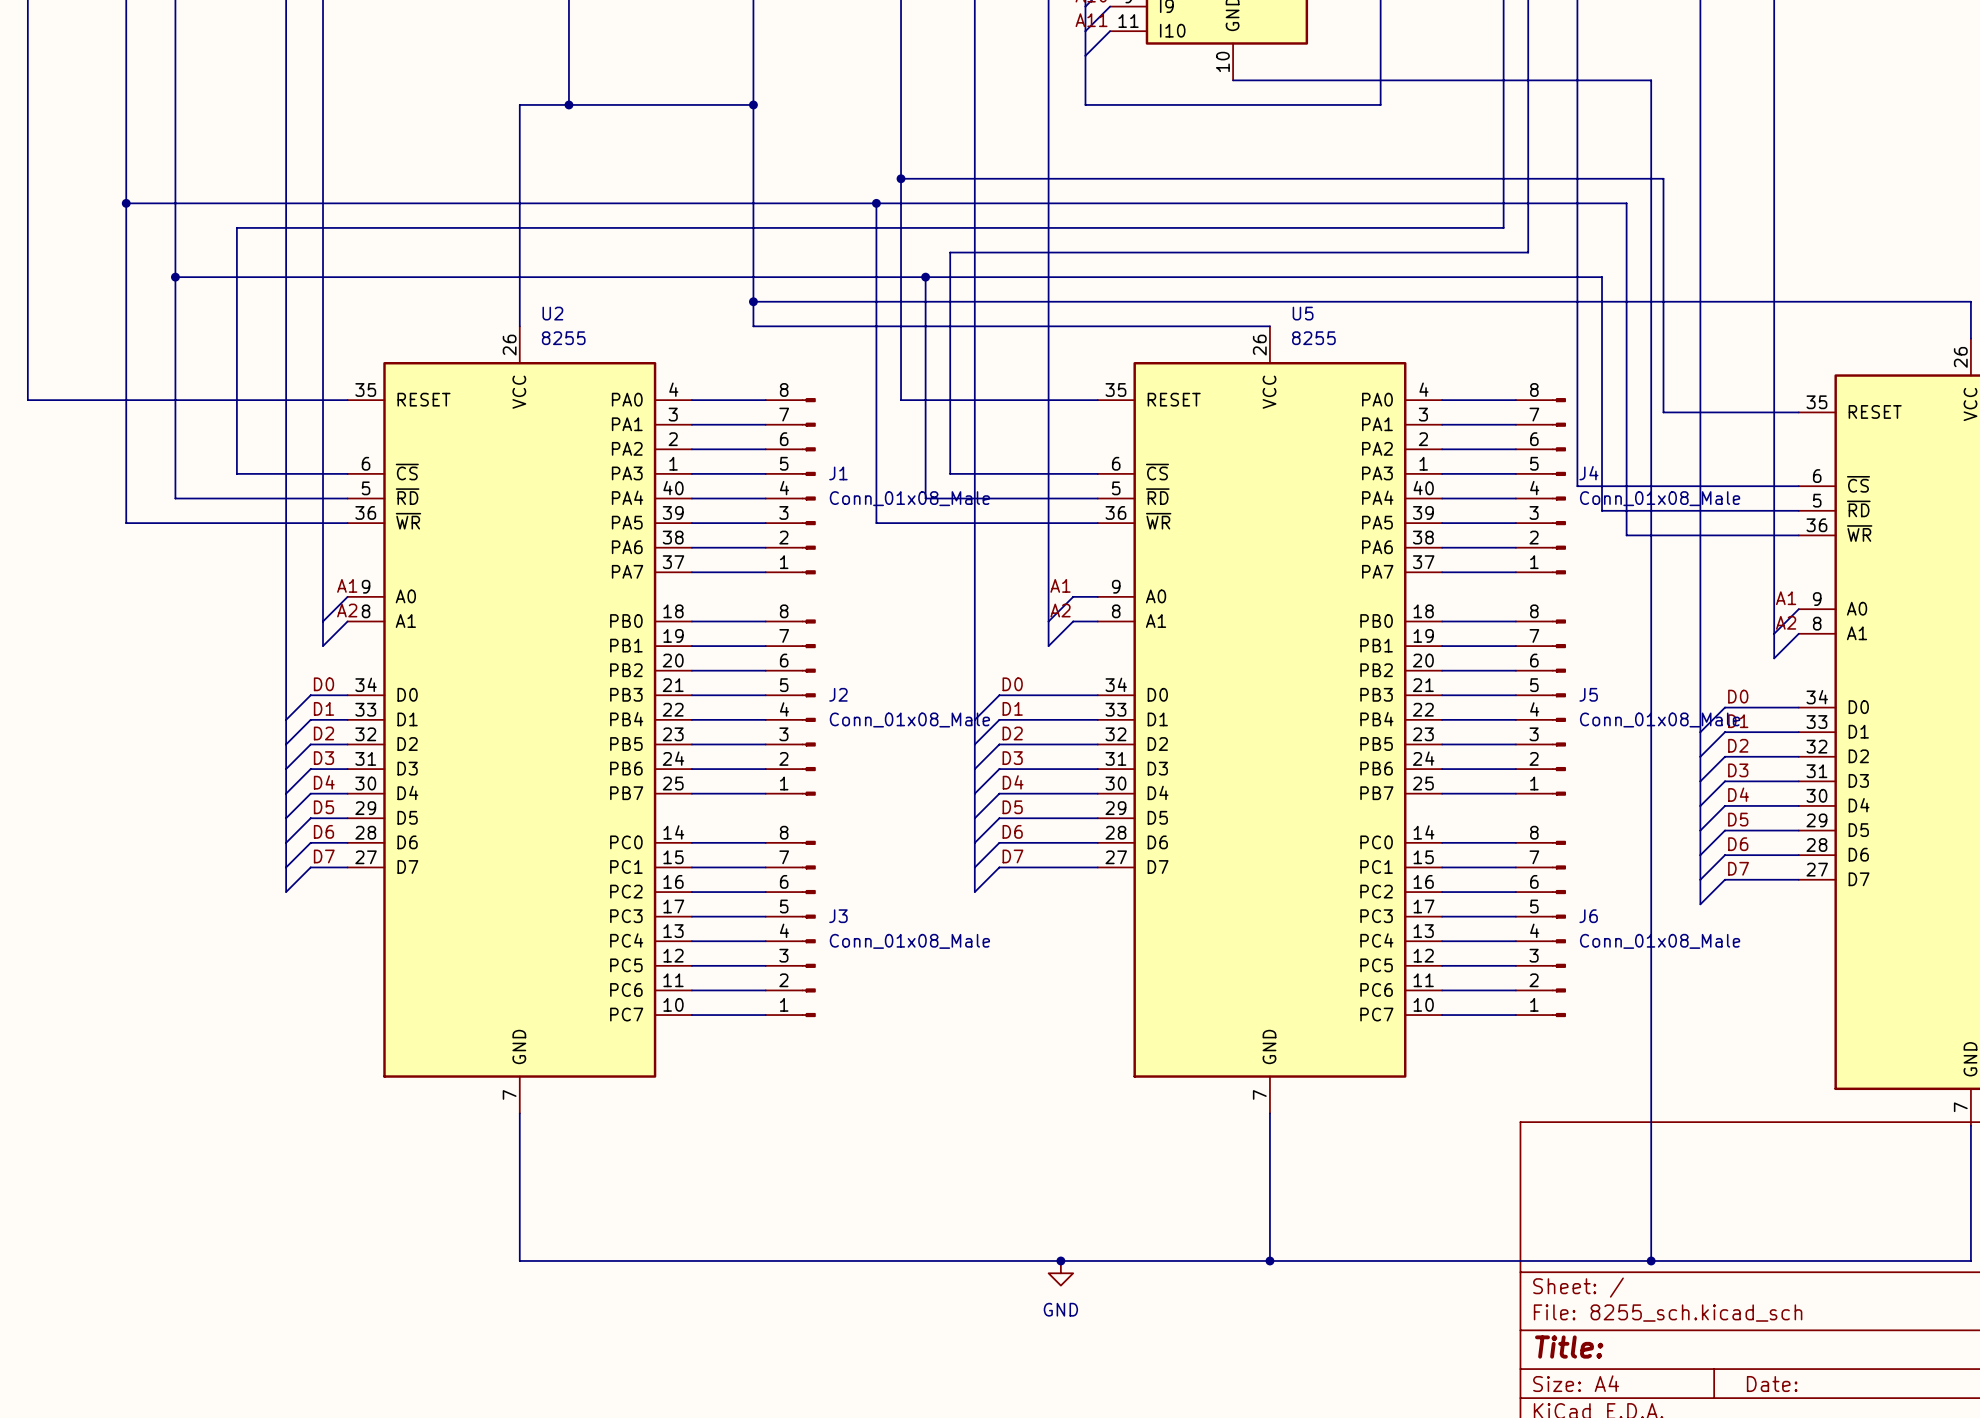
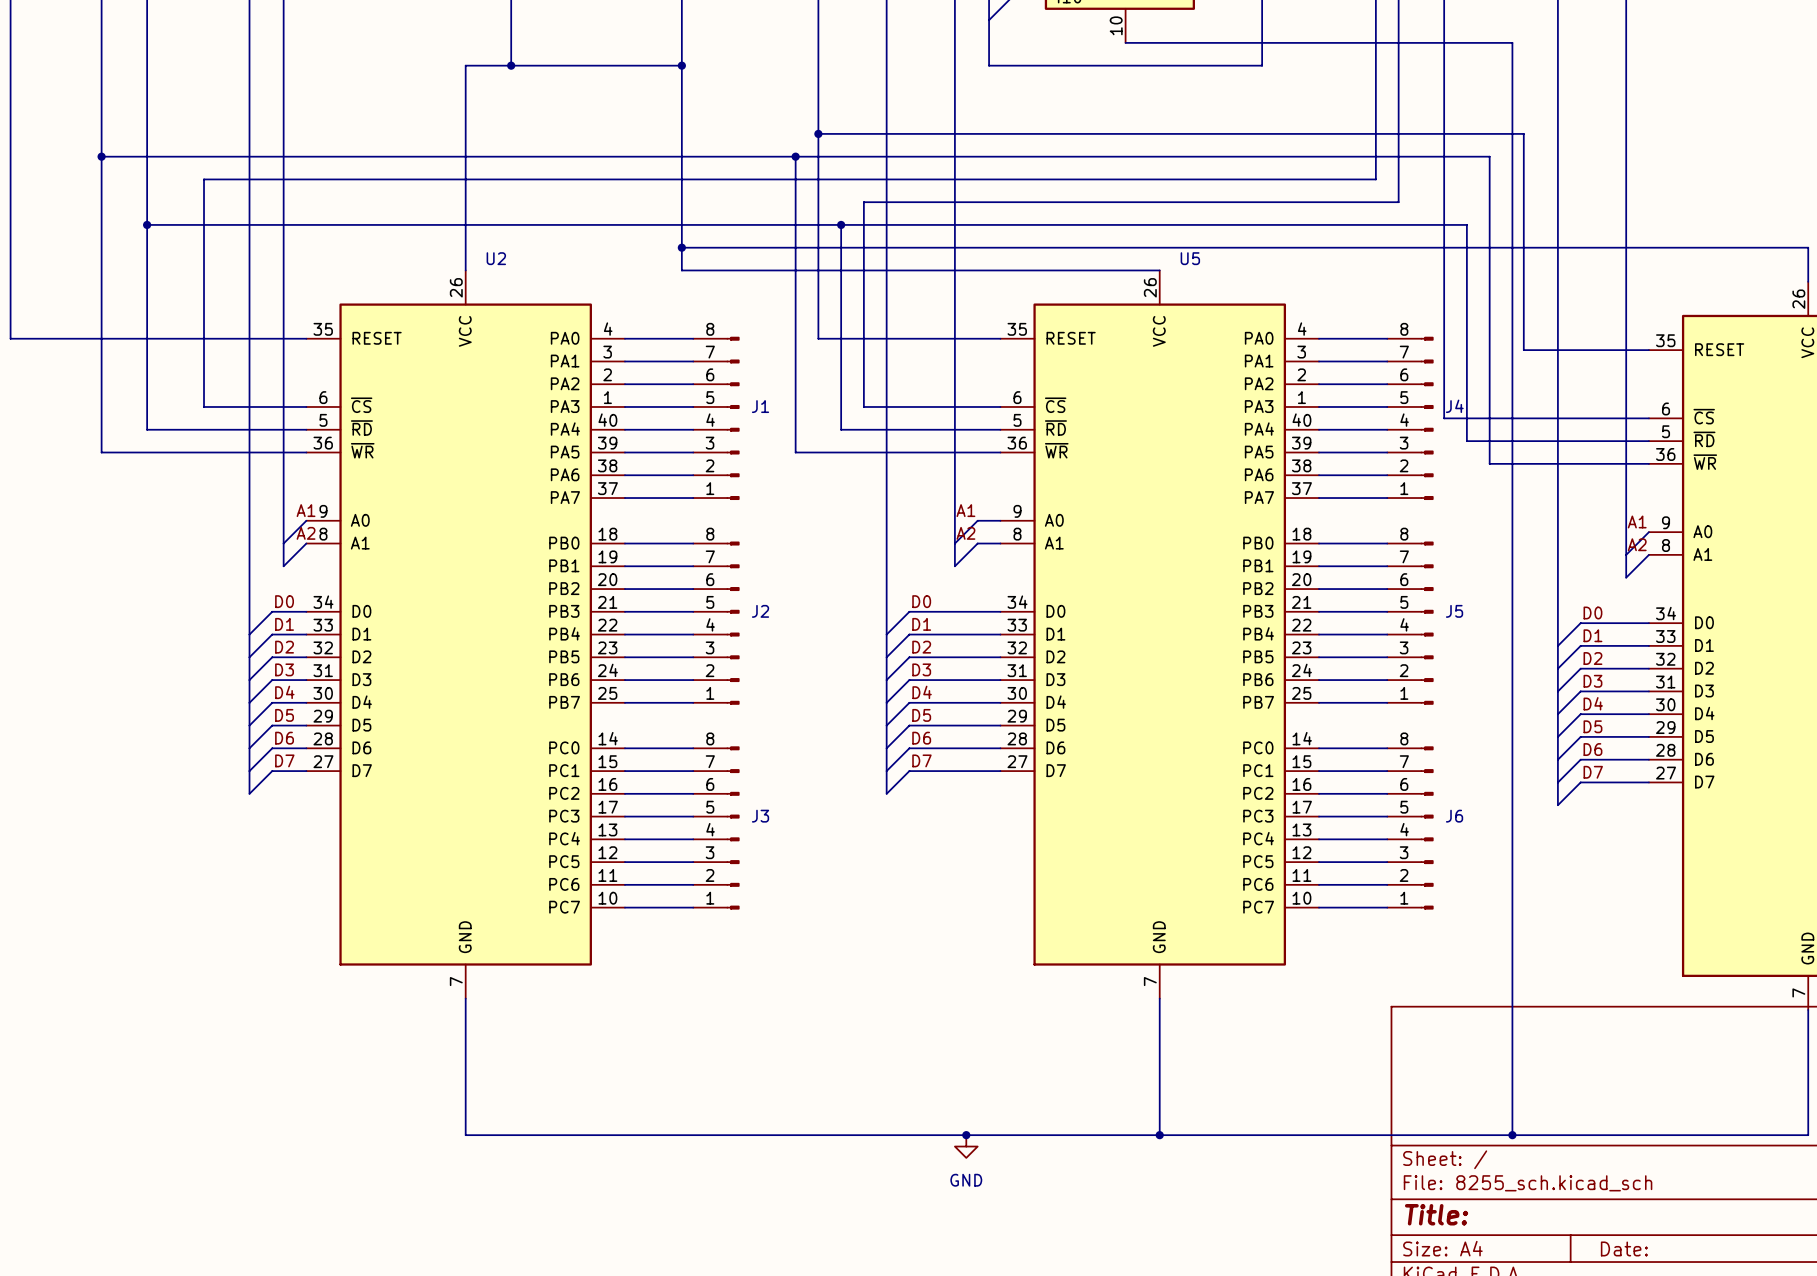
U2 value: 8255 (563, 338) -> none
U5 value: 8255 (1313, 338) -> none
J1 value: Conn_01x08_Male (909, 498) -> none
J4 value: Conn_01x08_Male (1660, 498) -> none
J2 value: Conn_01x08_Male (909, 720) -> none
J5 value: Conn_01x08_Male (1660, 720) -> none
J3 value: Conn_01x08_Male (909, 941) -> none
J6 value: Conn_01x08_Male (1660, 941) -> none

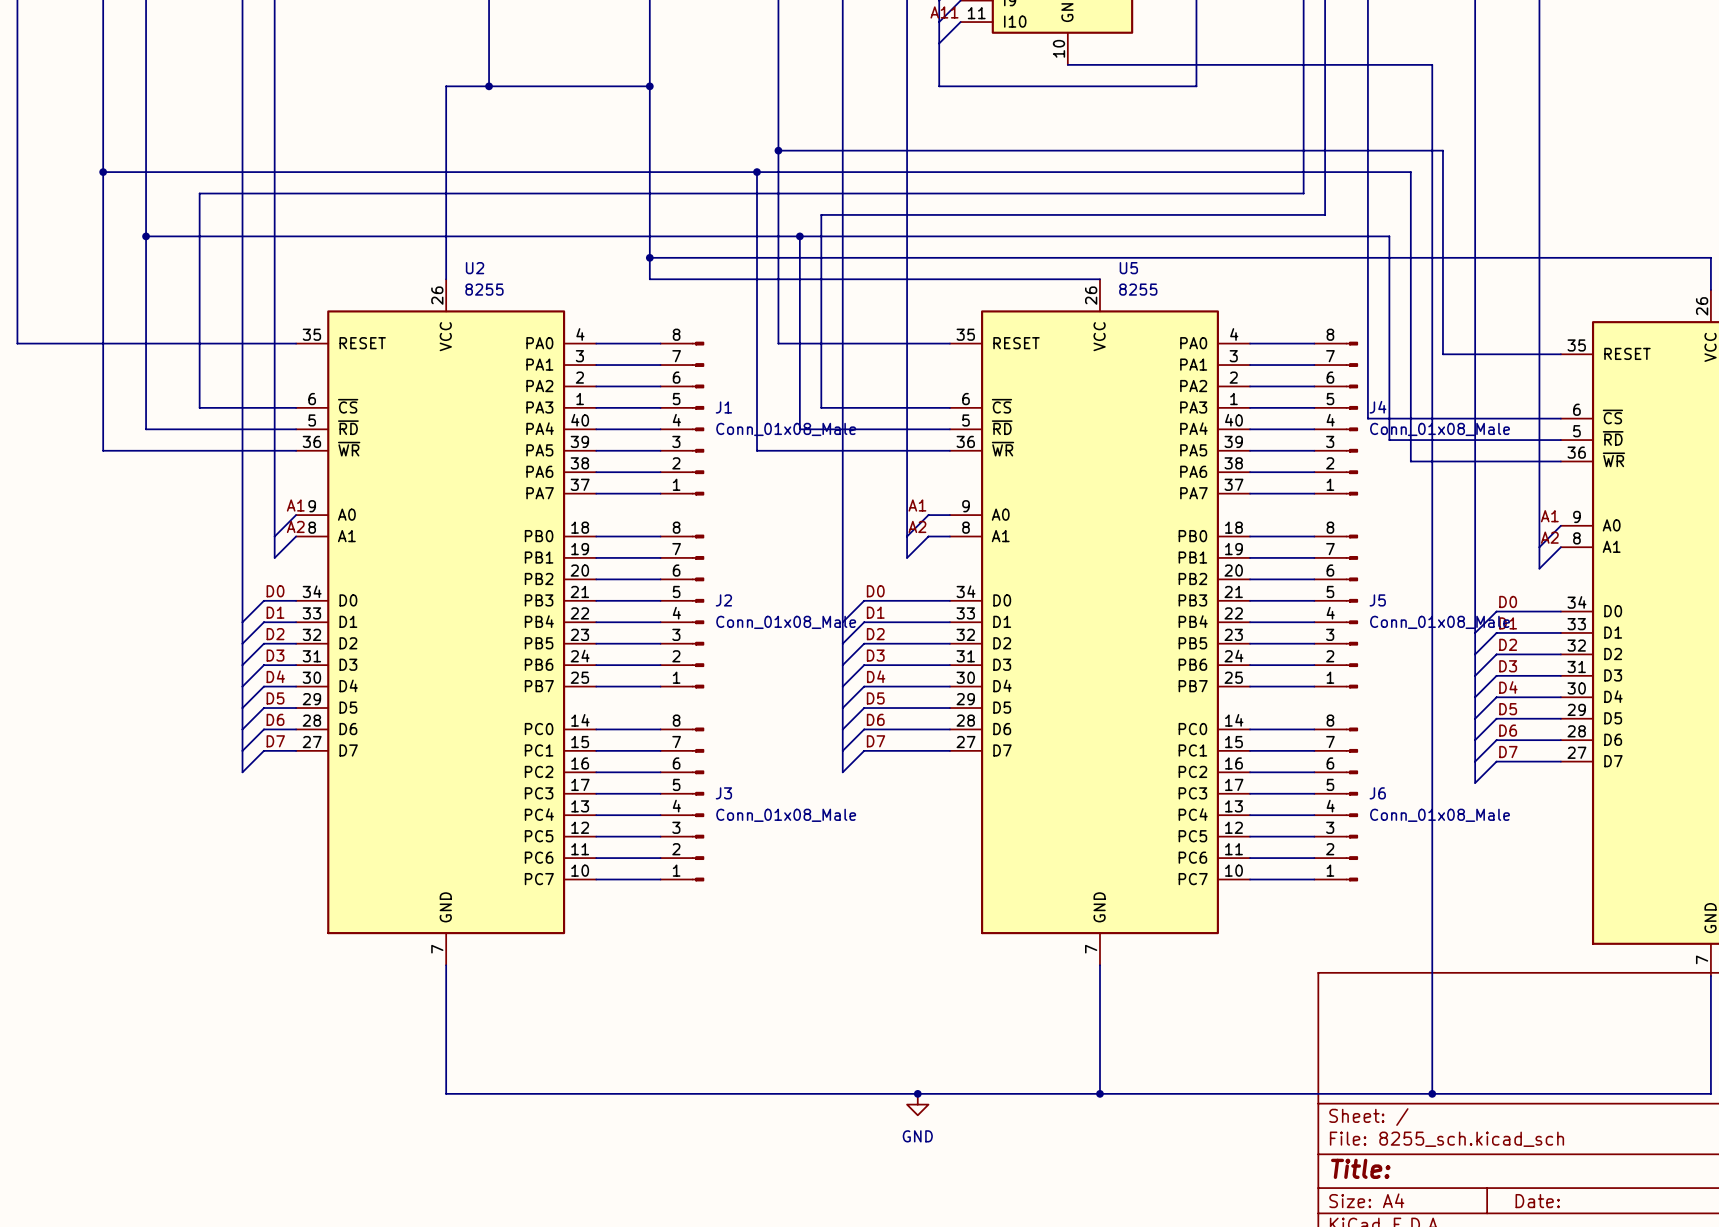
U2 value: none -> 8255 (484, 289)
U5 value: none -> 8255 (1138, 289)
J1 value: none -> Conn_01x08_Male (786, 429)
J4 value: none -> Conn_01x08_Male (1440, 429)
J2 value: none -> Conn_01x08_Male (786, 622)
J5 value: none -> Conn_01x08_Male (1440, 622)
J3 value: none -> Conn_01x08_Male (786, 815)
J6 value: none -> Conn_01x08_Male (1440, 815)

